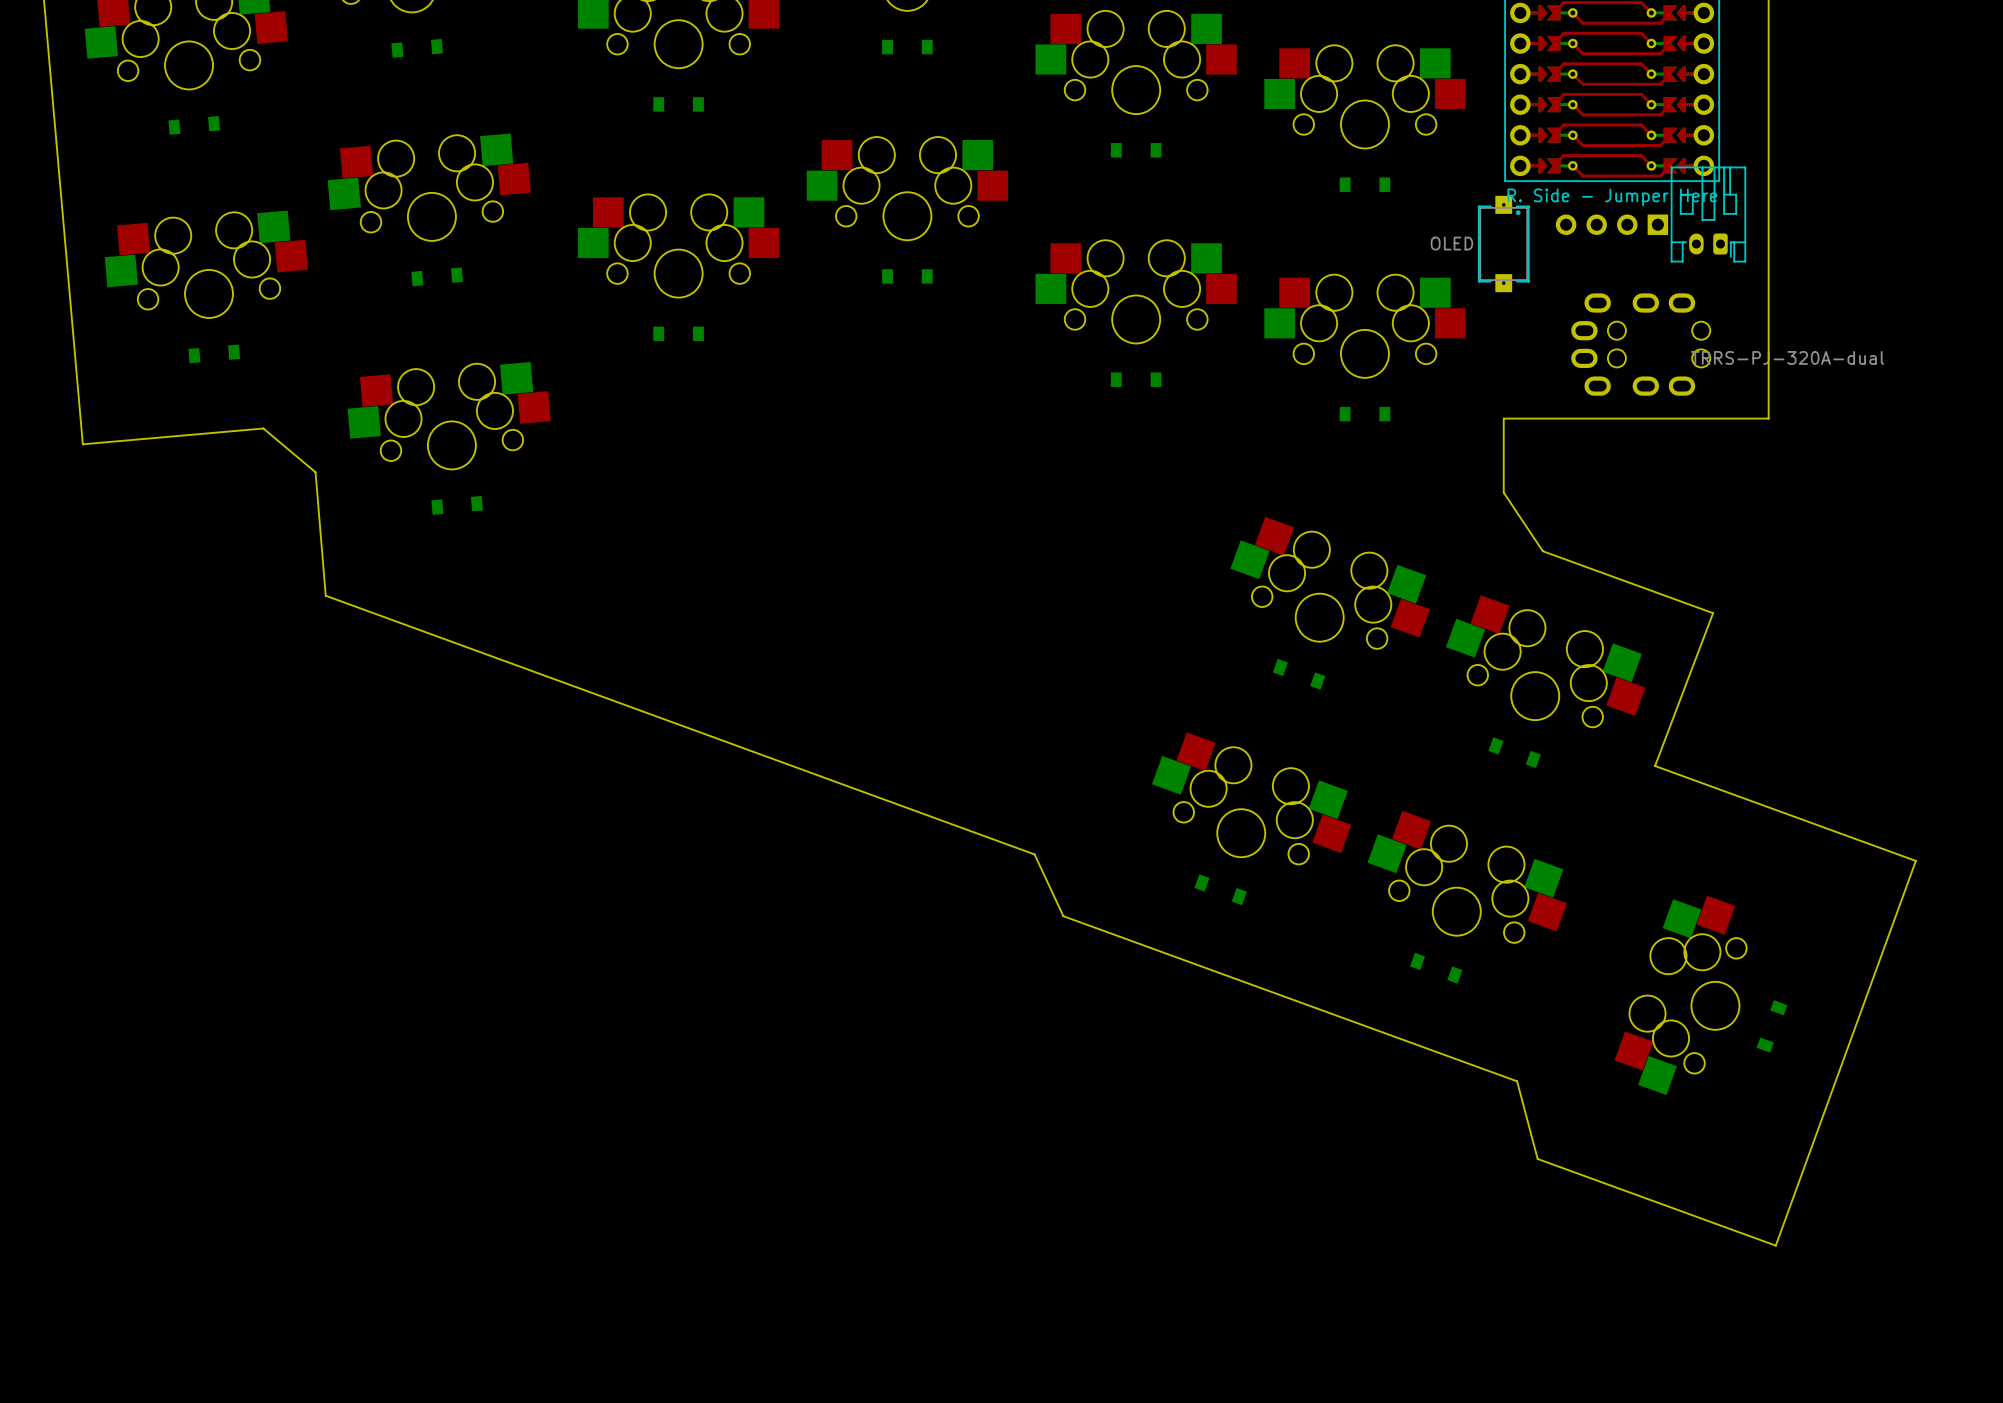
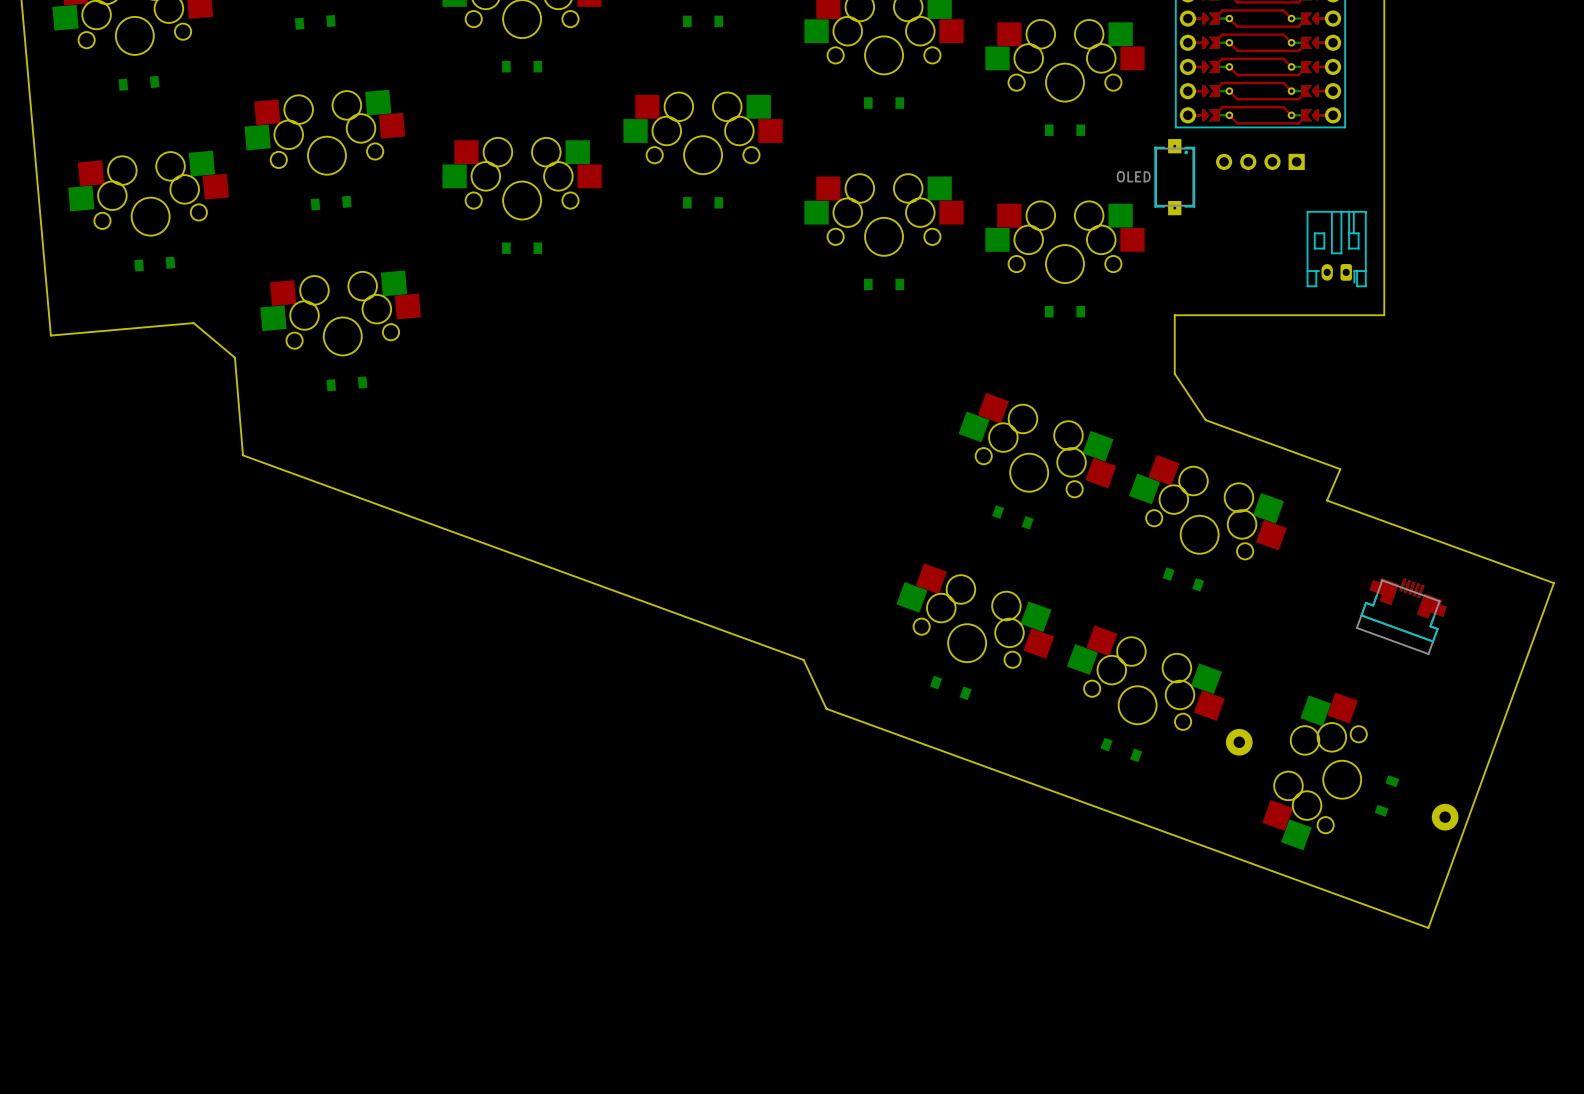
part text: R. Side - Jumper Here (1612, 197) -> none
part position: (1708, 214) -> (1336, 249)
part: TRRS-PJ-320A-dual (1640, 344) -> none
board edge: (1713, 613) (1655, 766) (1915, 860) (1775, 1245) (1537, 1158) (1517, 1081) -> (1340, 469) (1327, 500) (1553, 583) (1428, 927) (1185, 839)
part: none -> (1401, 616)
part: none -> (1239, 742)
part: none -> (1445, 817)

